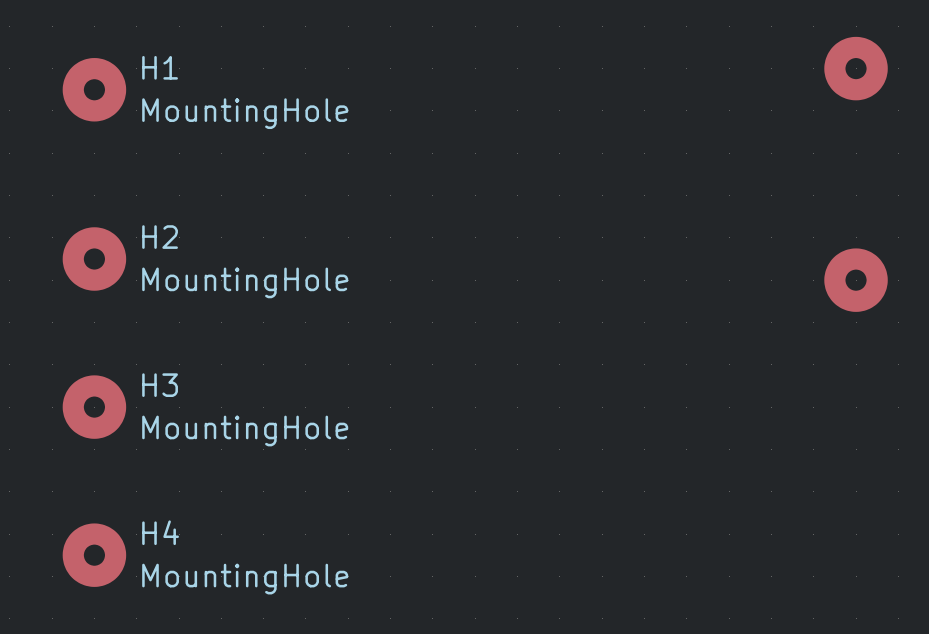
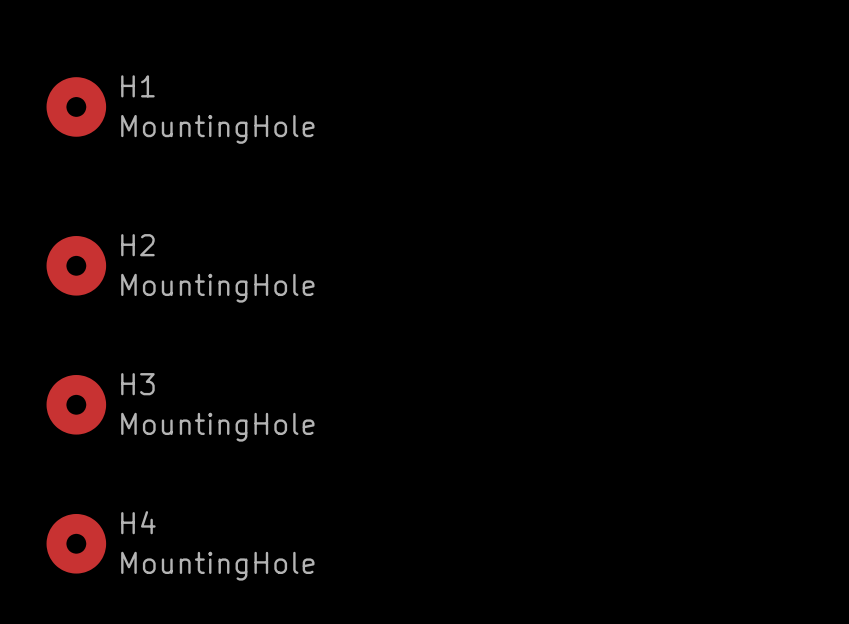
part: (856, 68) -> none
part: (856, 280) -> none

